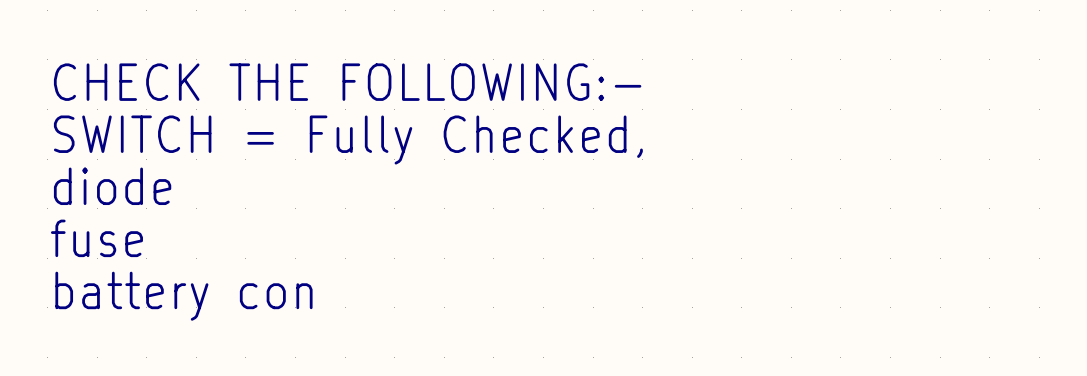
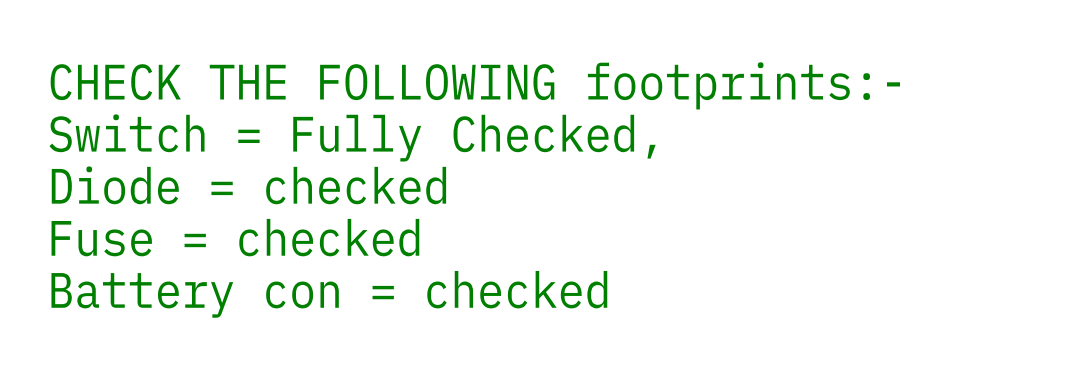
text: CHECK THE FOLLOWING:- (347, 82) -> CHECK THE FOLLOWING footprints:- (475, 85)
text: SWITCH = Fully Checked, (348, 140) -> Switch = Fully Checked, (352, 137)
text: diode (112, 186) -> Diode = checked (248, 185)
text: fuse (96, 238) -> Fuse = checked (235, 237)
text: battery con (183, 296) -> Battery con = checked (329, 294)

